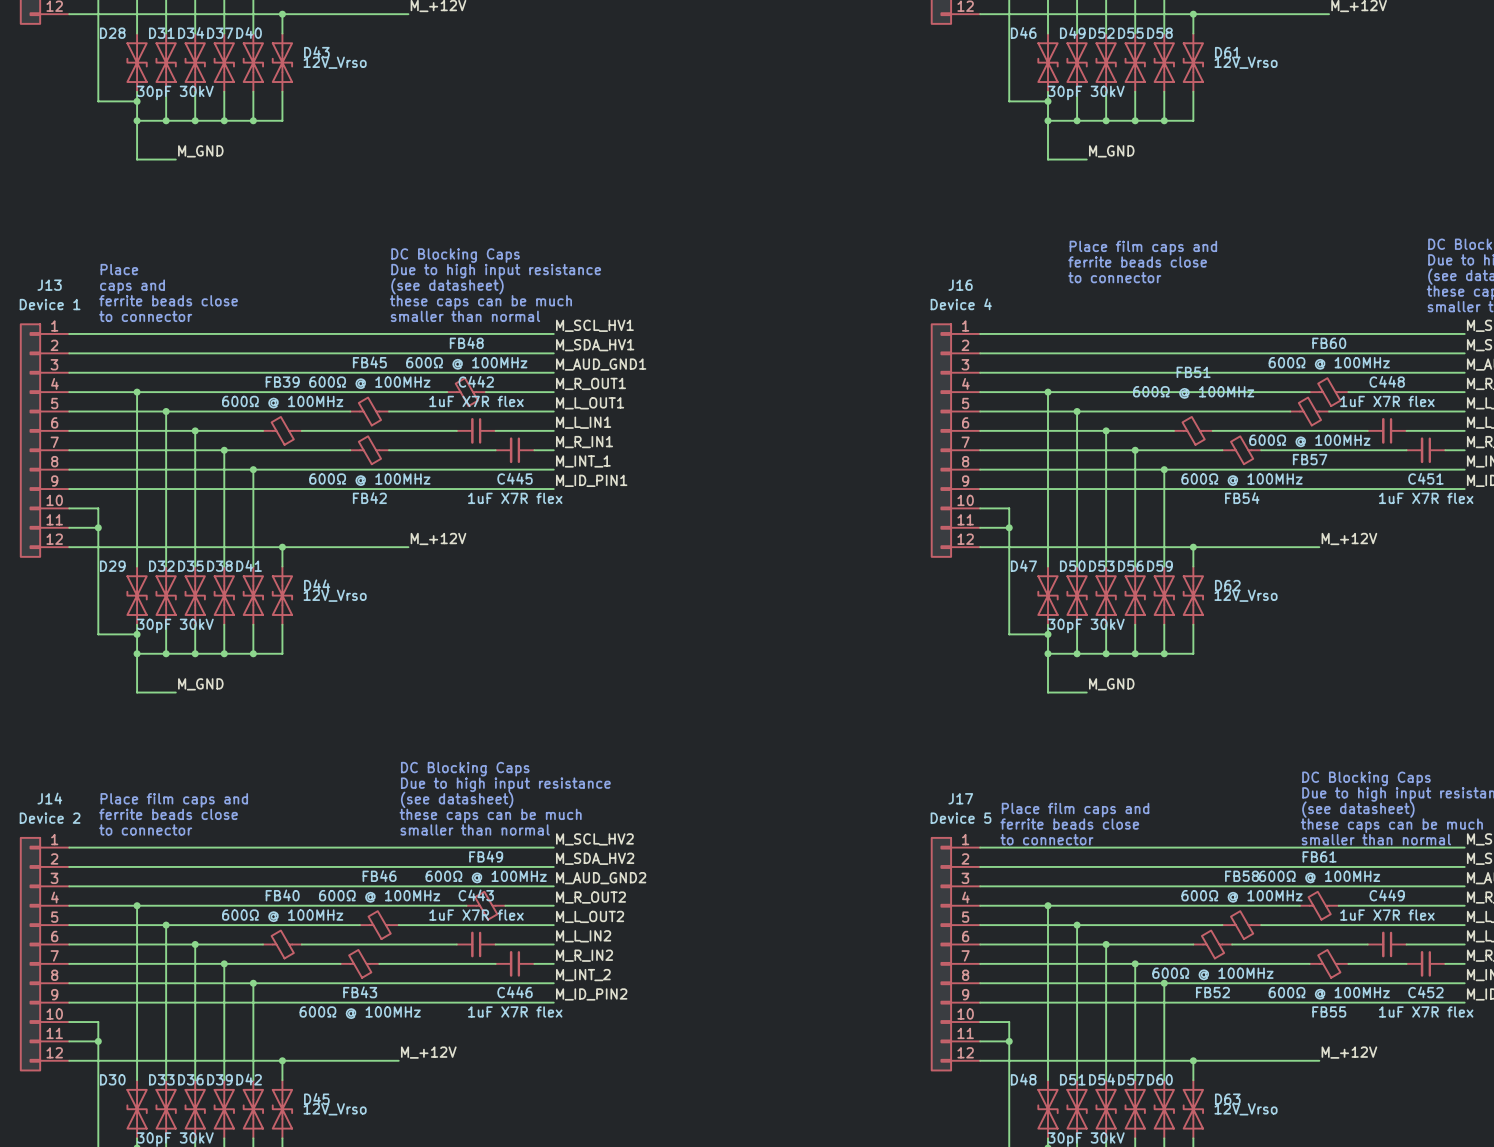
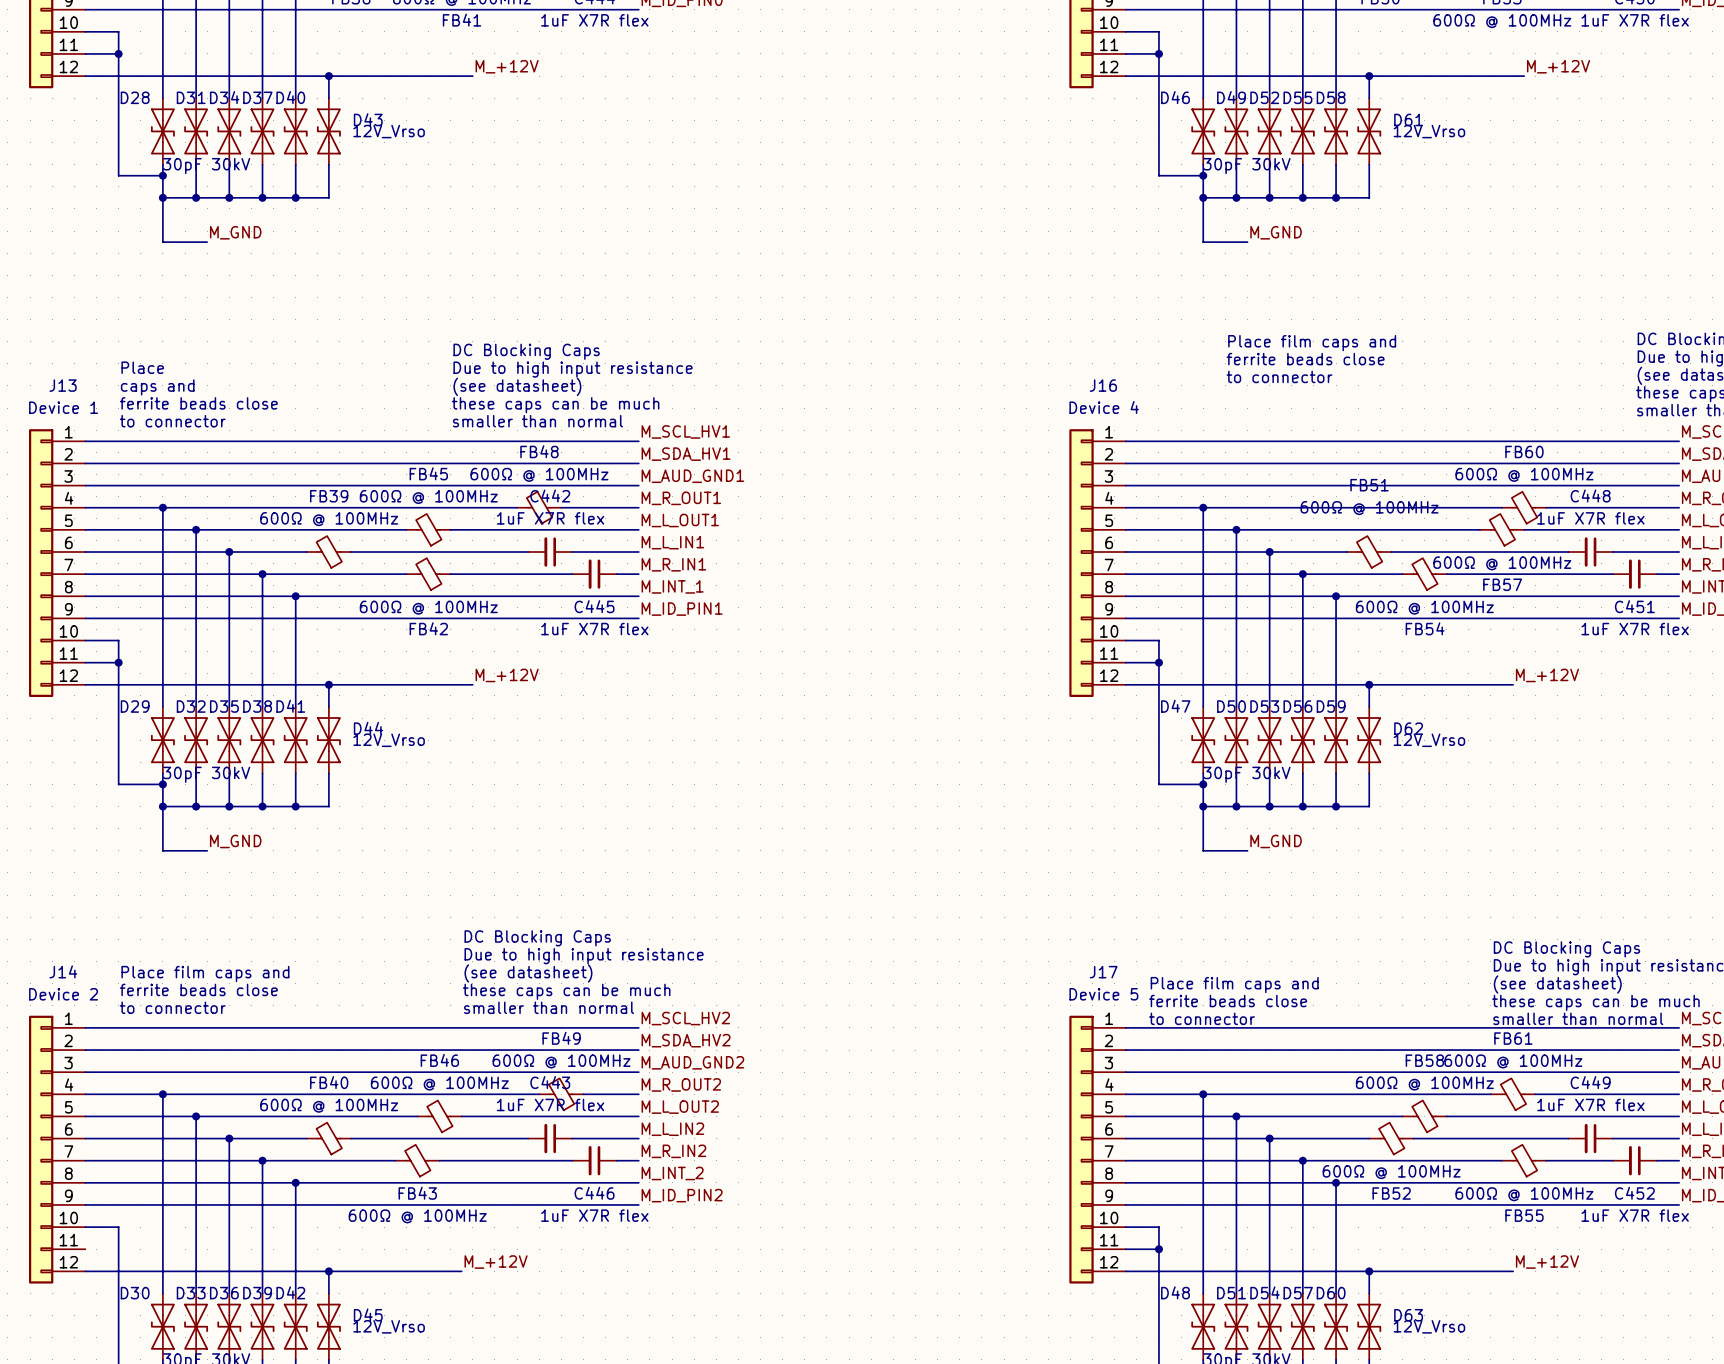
wire: (69, 1041) (98, 1041) -> none
junction: (98, 1041) -> none

